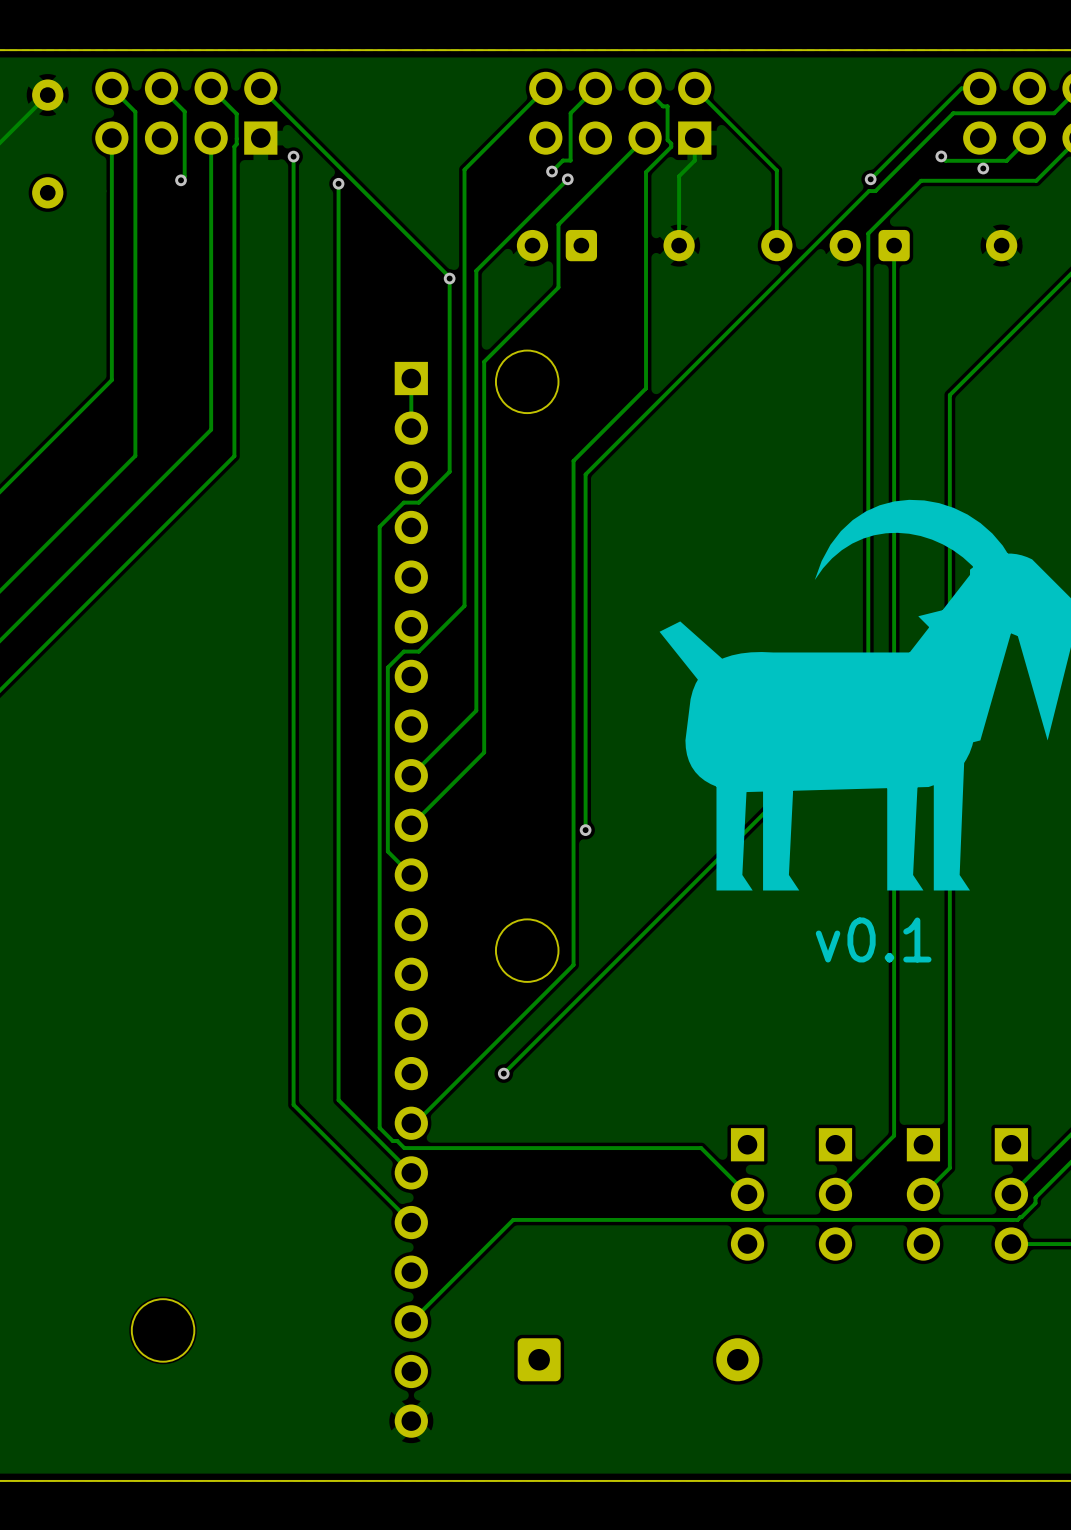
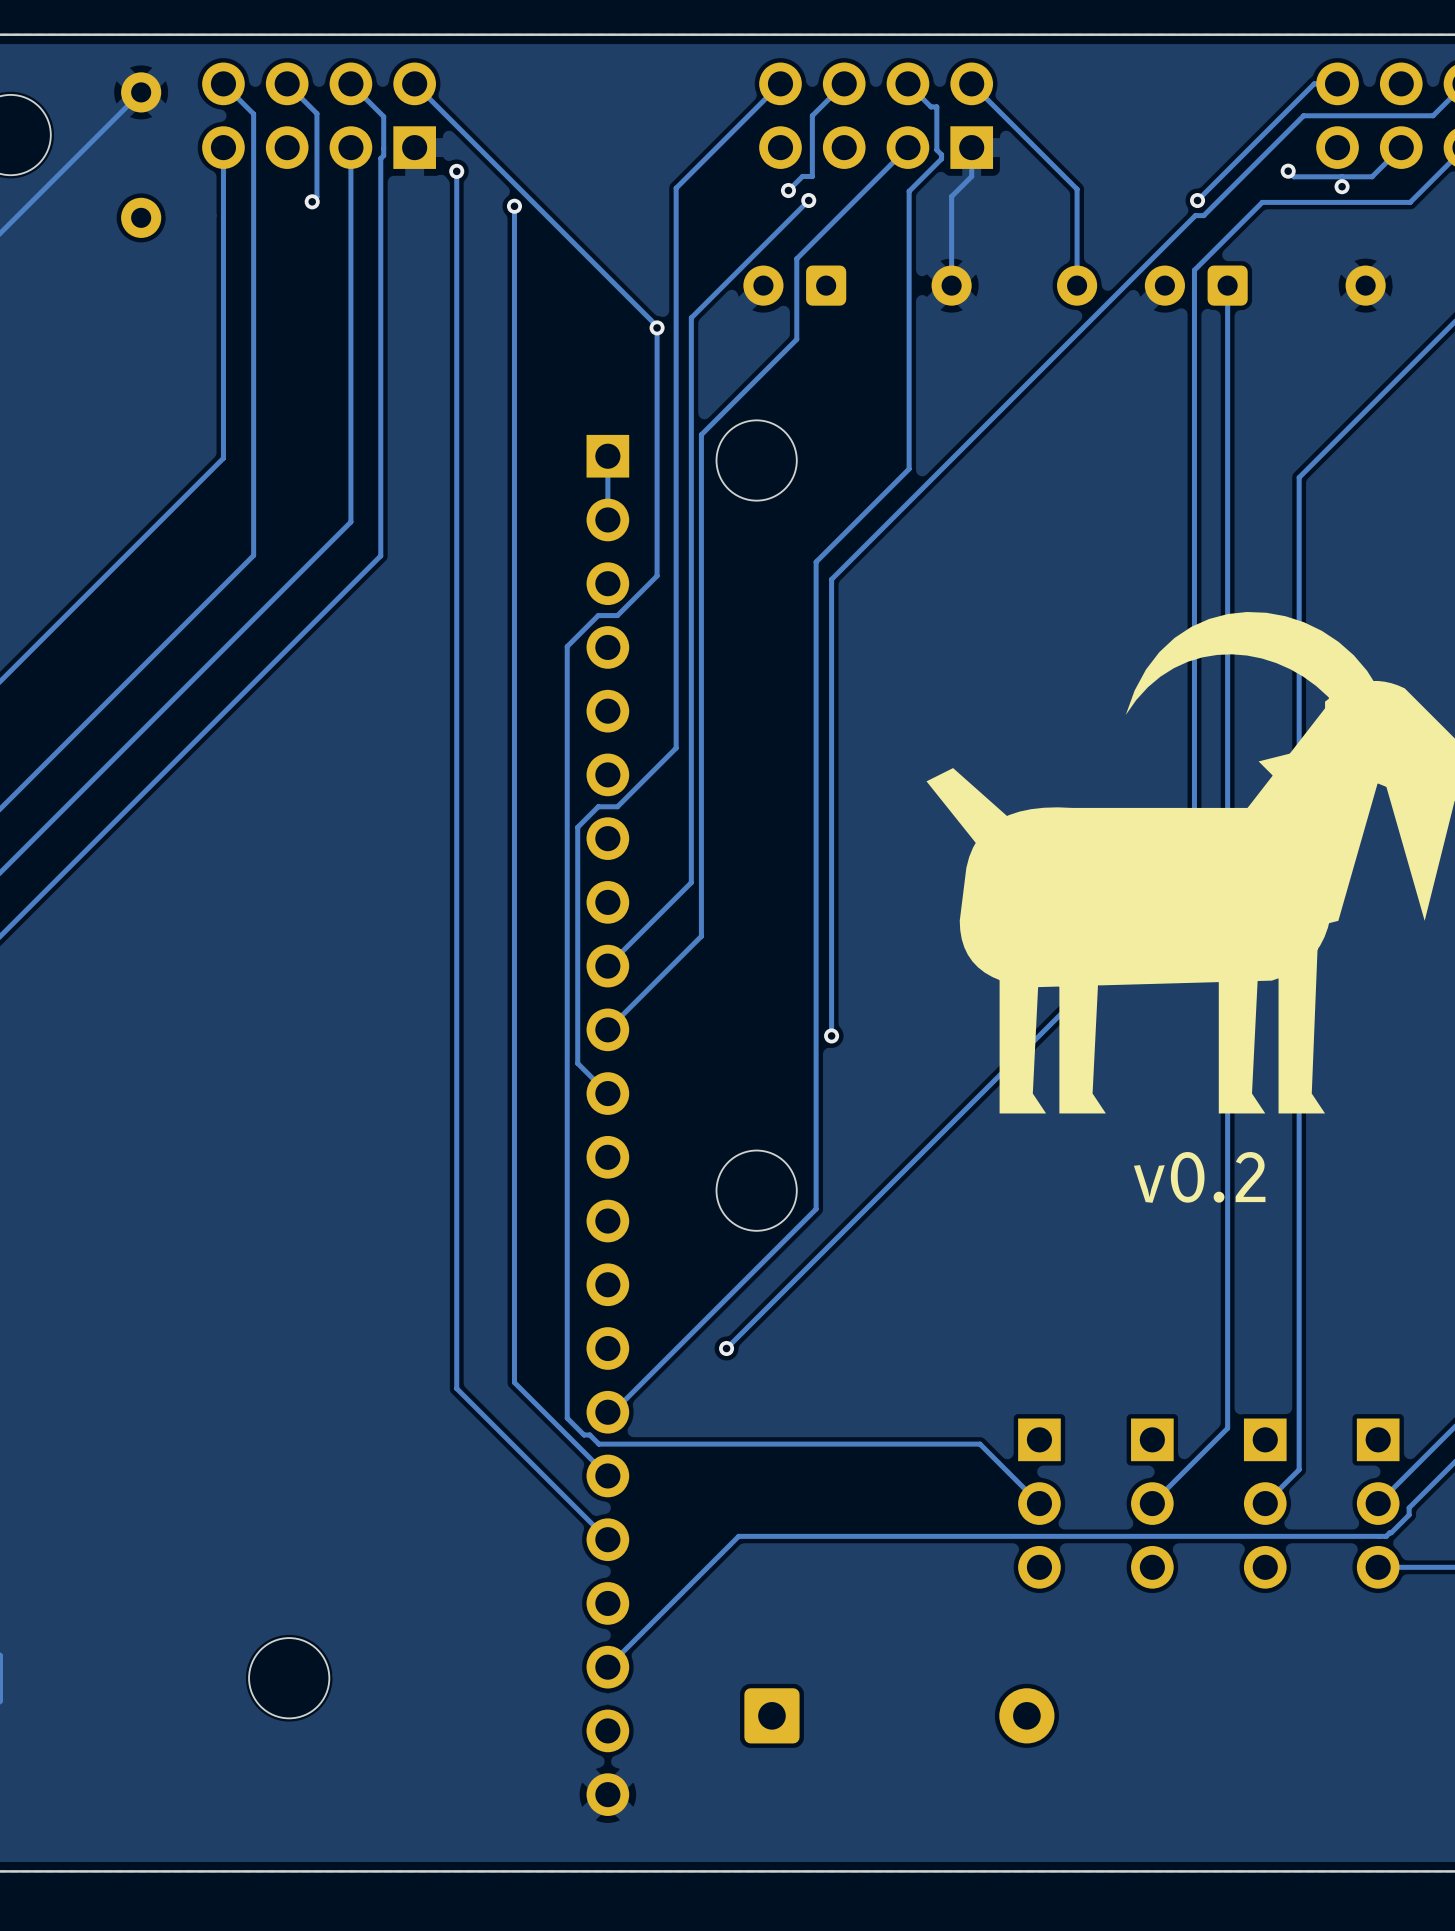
text: v0.1 (873, 939) -> v0.2 (1199, 1177)

